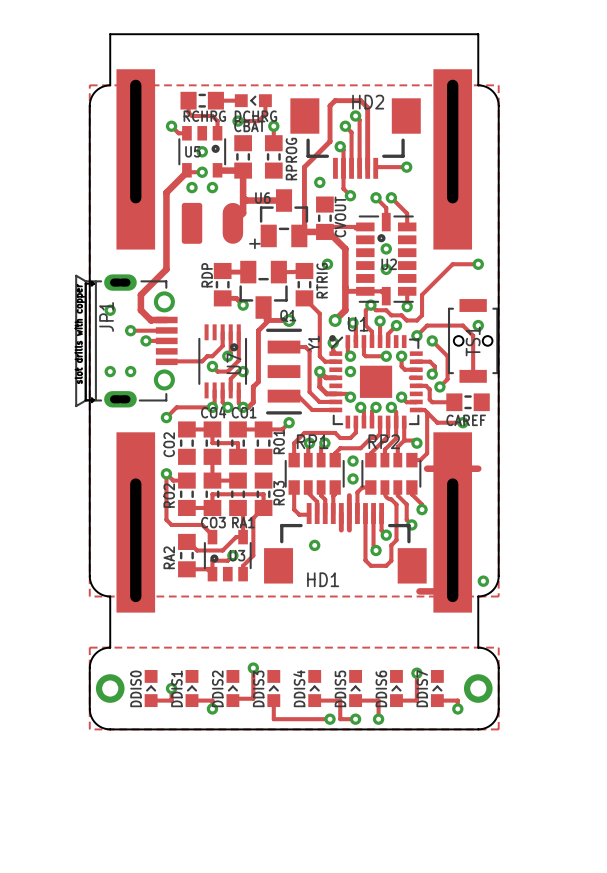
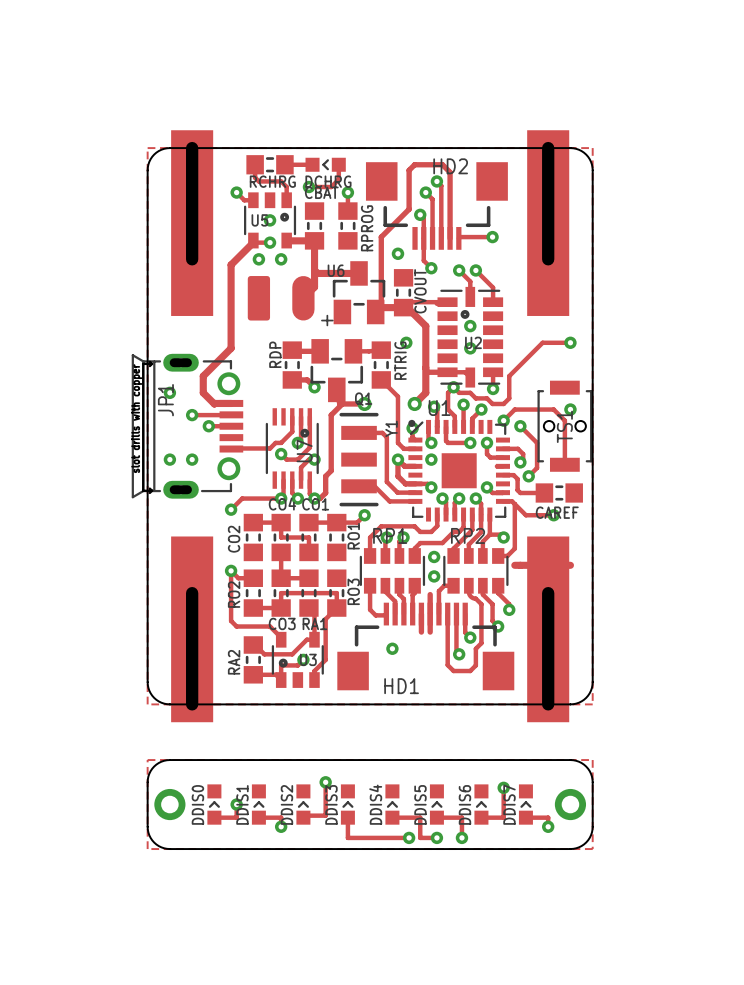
part footprint: [116, 69, 156, 250] -> [171, 130, 214, 316]
part footprint: [433, 69, 473, 250] -> [527, 130, 570, 316]
board edge: (110, 85) (110, 34) (478, 34) (478, 85) -> (169, 148) (570, 148)
part footprint: [116, 432, 156, 613] -> [171, 536, 214, 723]
part footprint: [433, 432, 473, 613] -> [527, 536, 570, 723]
via: (483, 581) -> none
track: (419, 591) (437, 591) -> none
board edge: (110, 596) (110, 647) -> (169, 704) (570, 704)
board edge: (478, 596) (478, 647) -> (169, 760) (570, 760)

